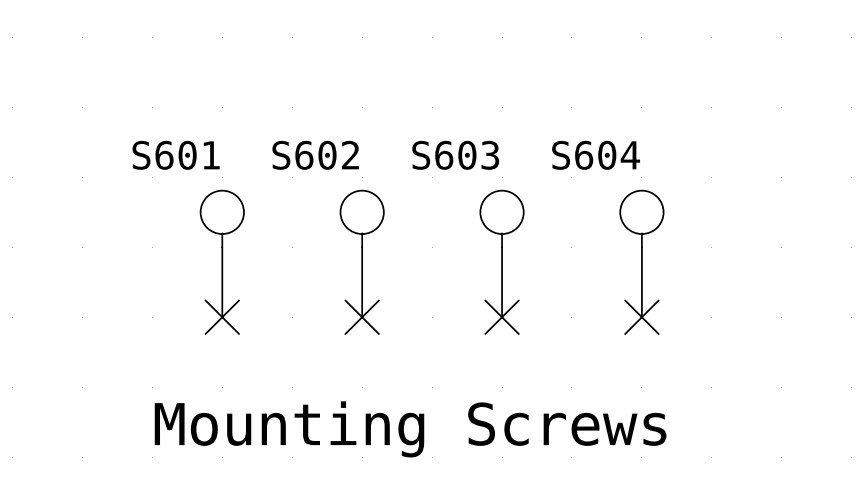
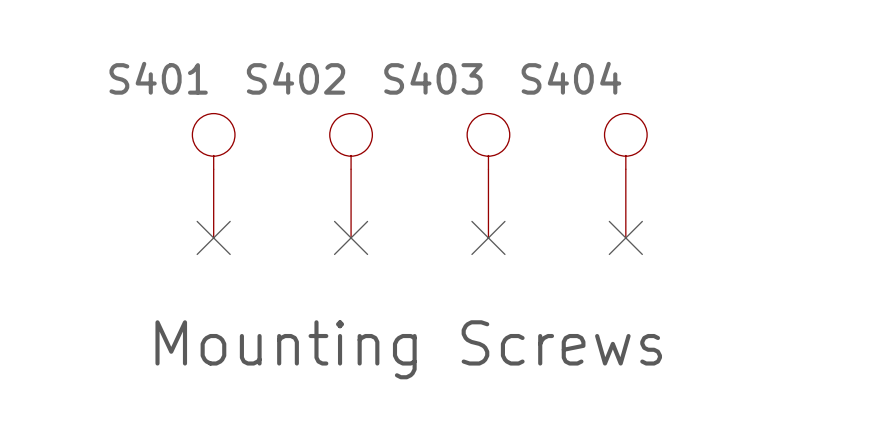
S601 name: S601 (176, 155) -> S401 (158, 78)
S602 name: S602 (315, 155) -> S402 (296, 78)
S603 name: S603 (455, 155) -> S403 (433, 78)
S604 name: S604 (596, 155) -> S404 (571, 78)

